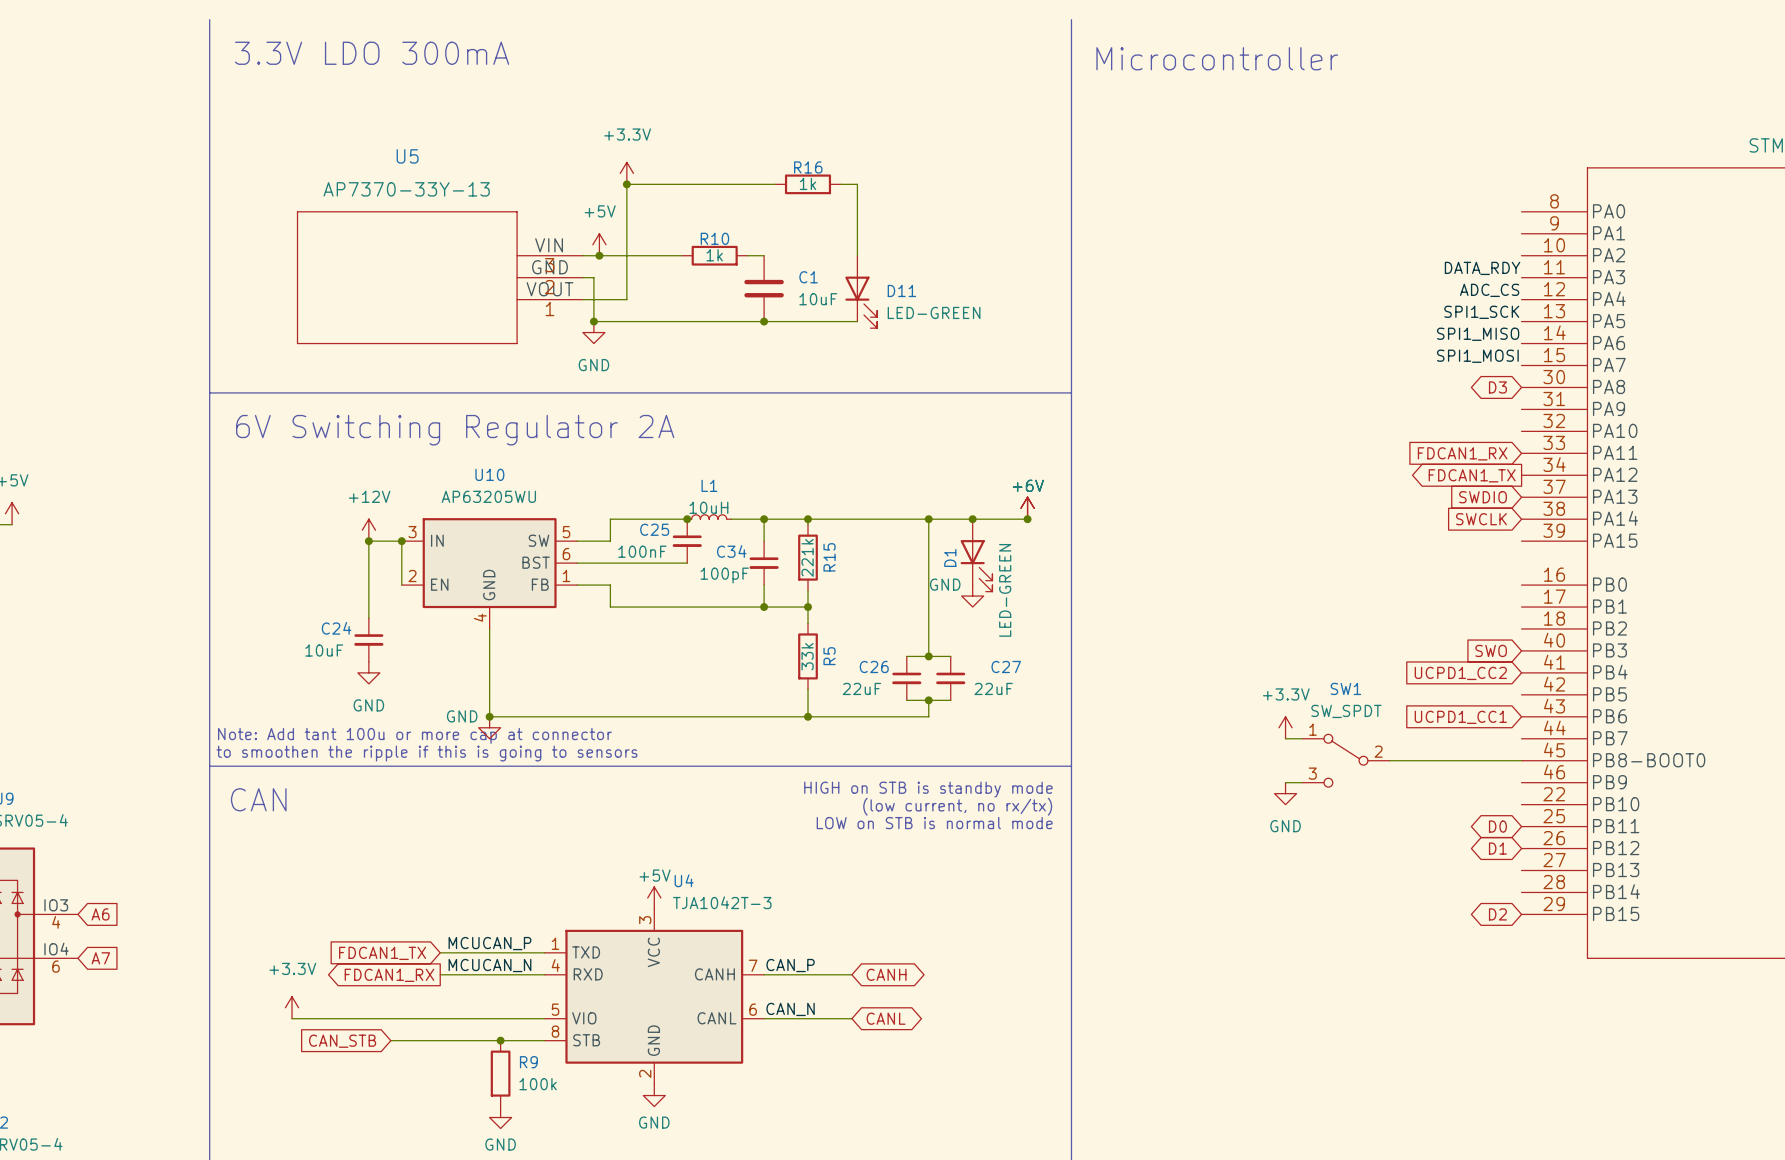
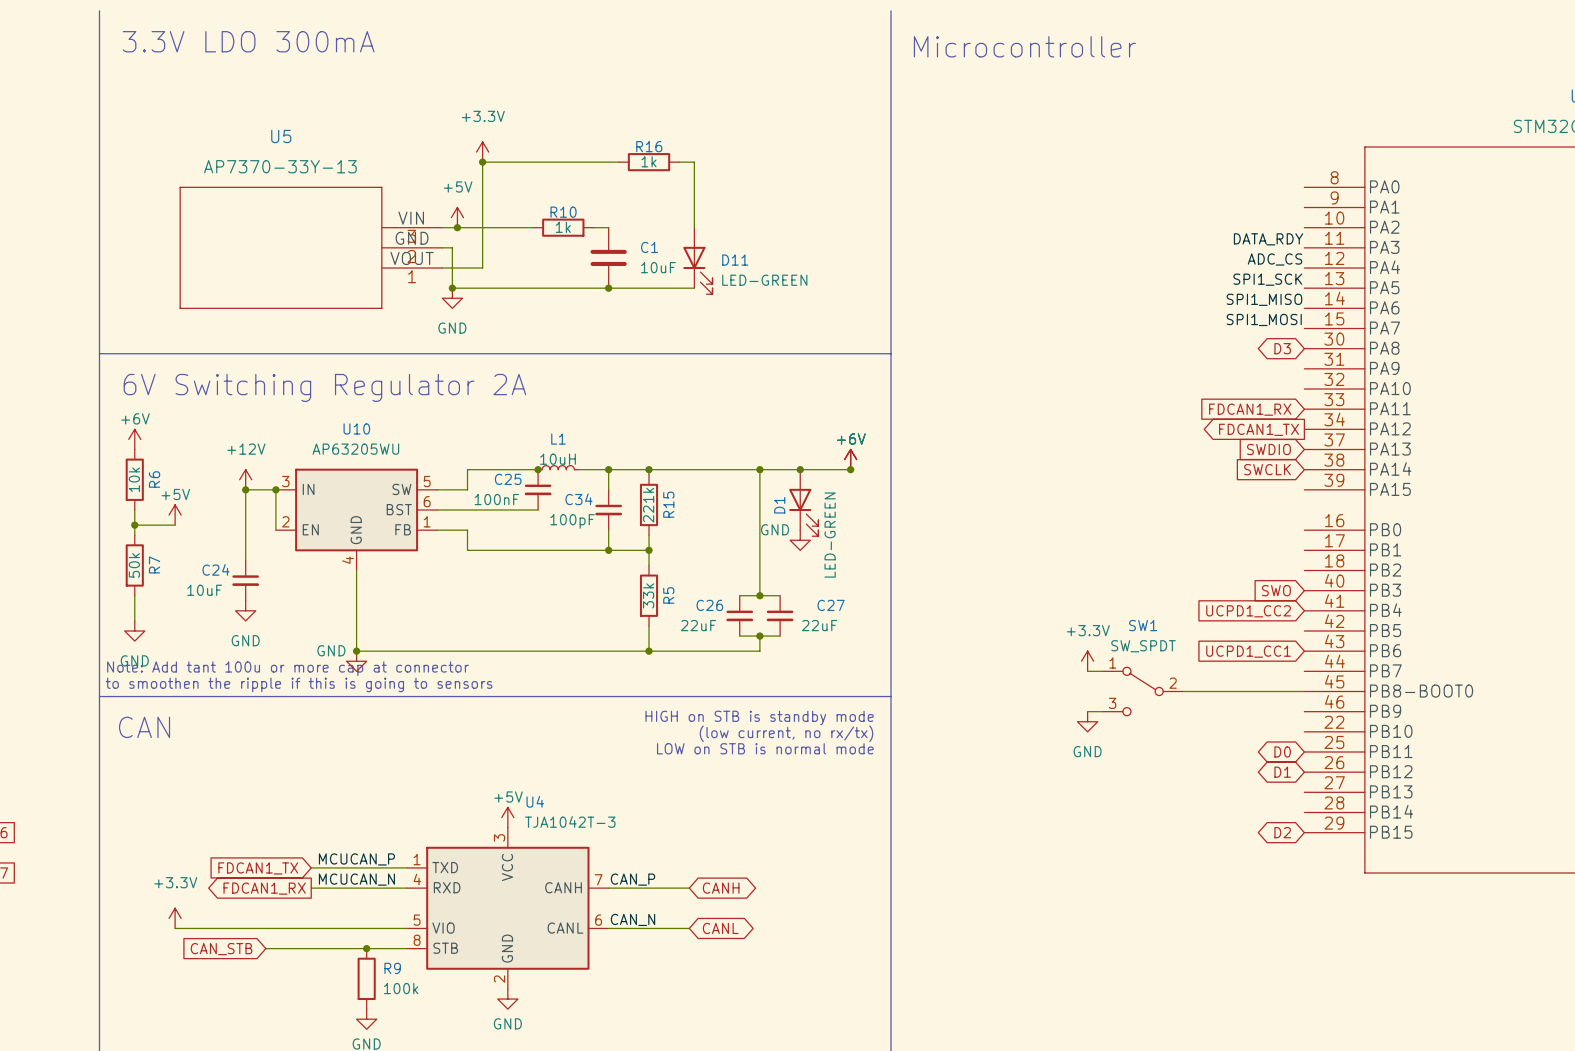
power symbol: none -> +6V (134, 439)
R6: none -> 10k (134, 479)
wire: none -> (134, 510) (134, 535)
power symbol: none -> +5V (175, 515)
wire: none -> (134, 525) (175, 525)
junction: none -> (134, 525)
R7: none -> 50k (134, 565)
wire: none -> (134, 595) (134, 620)
power symbol: none -> GND (134, 631)

